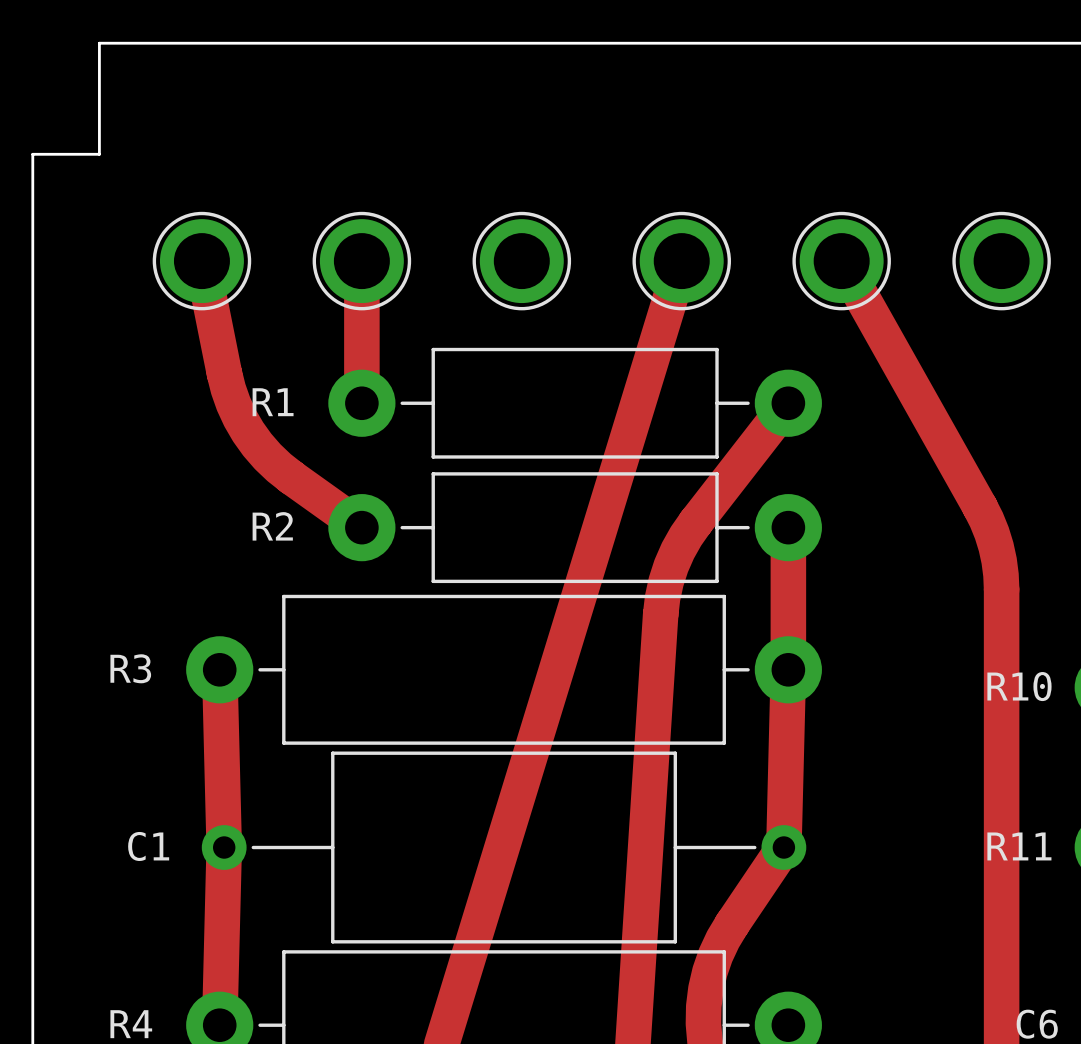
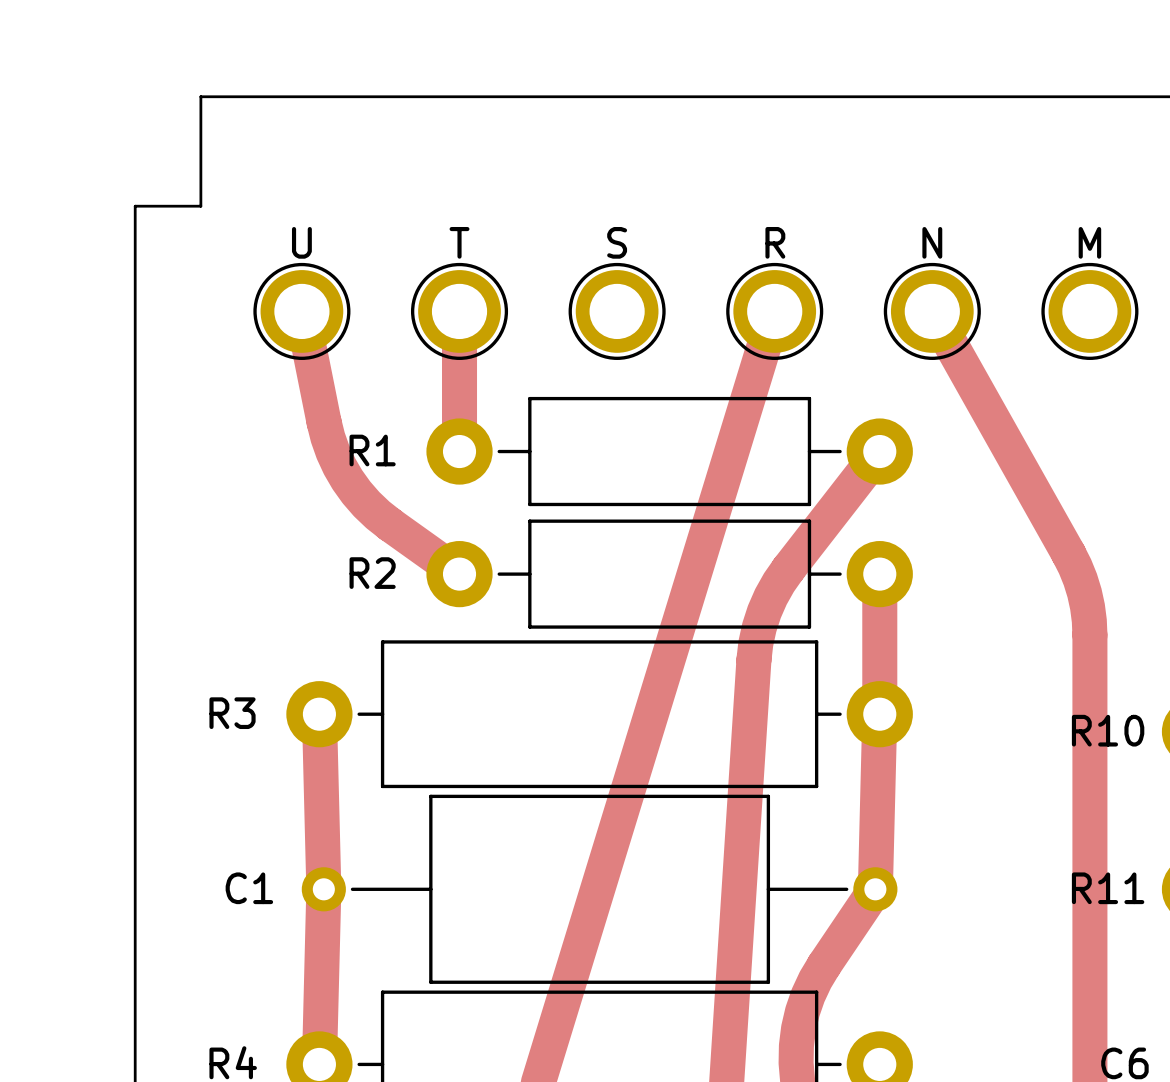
part value: none -> U (301, 242)
part value: none -> T (459, 242)
part value: none -> S (617, 242)
part value: none -> R (775, 242)
part value: none -> N (932, 242)
part value: none -> M (1089, 242)

